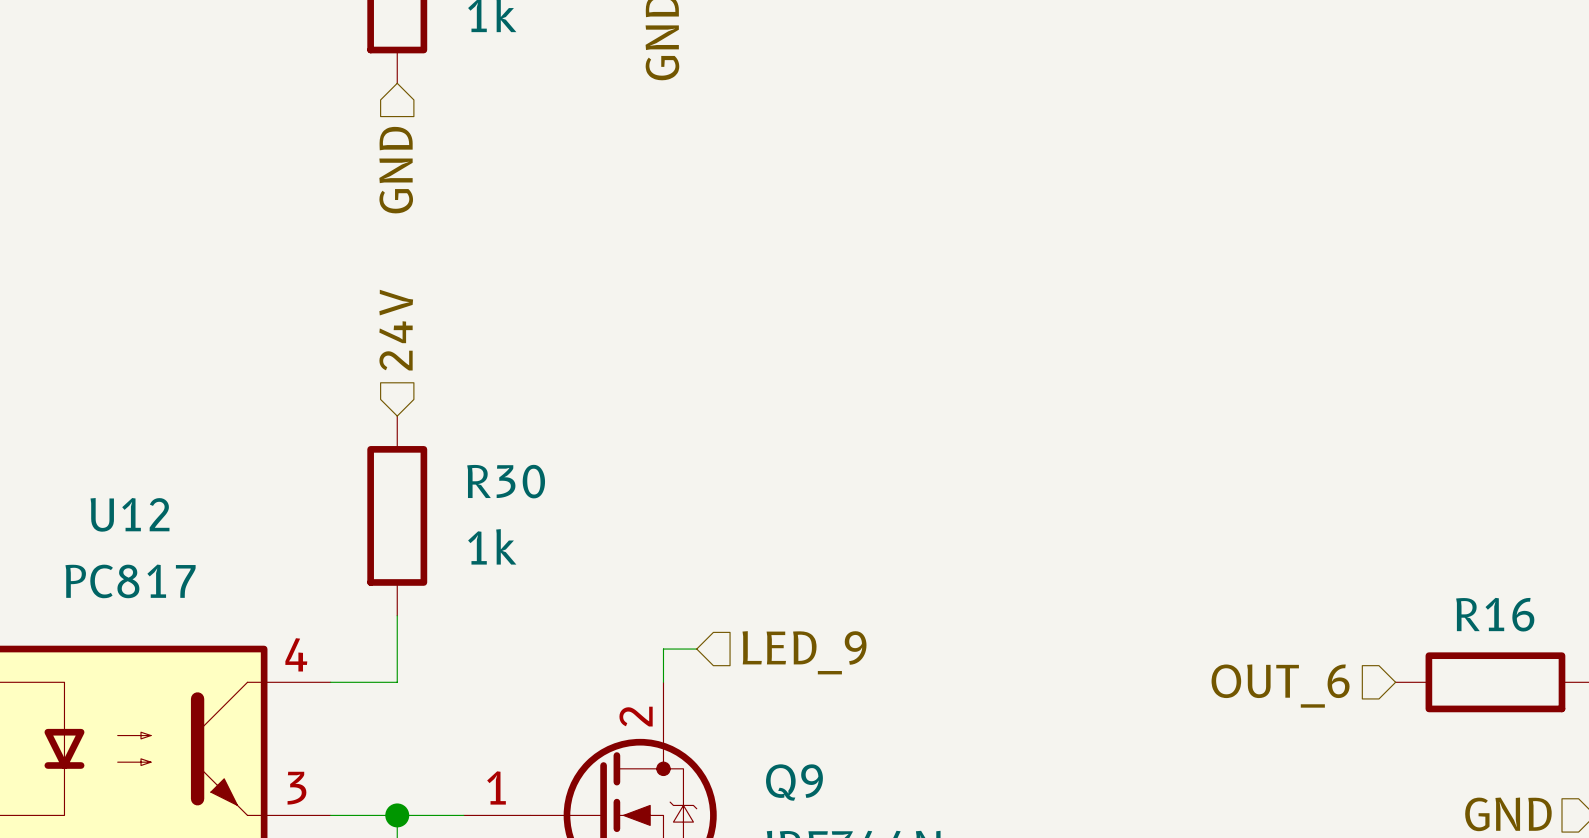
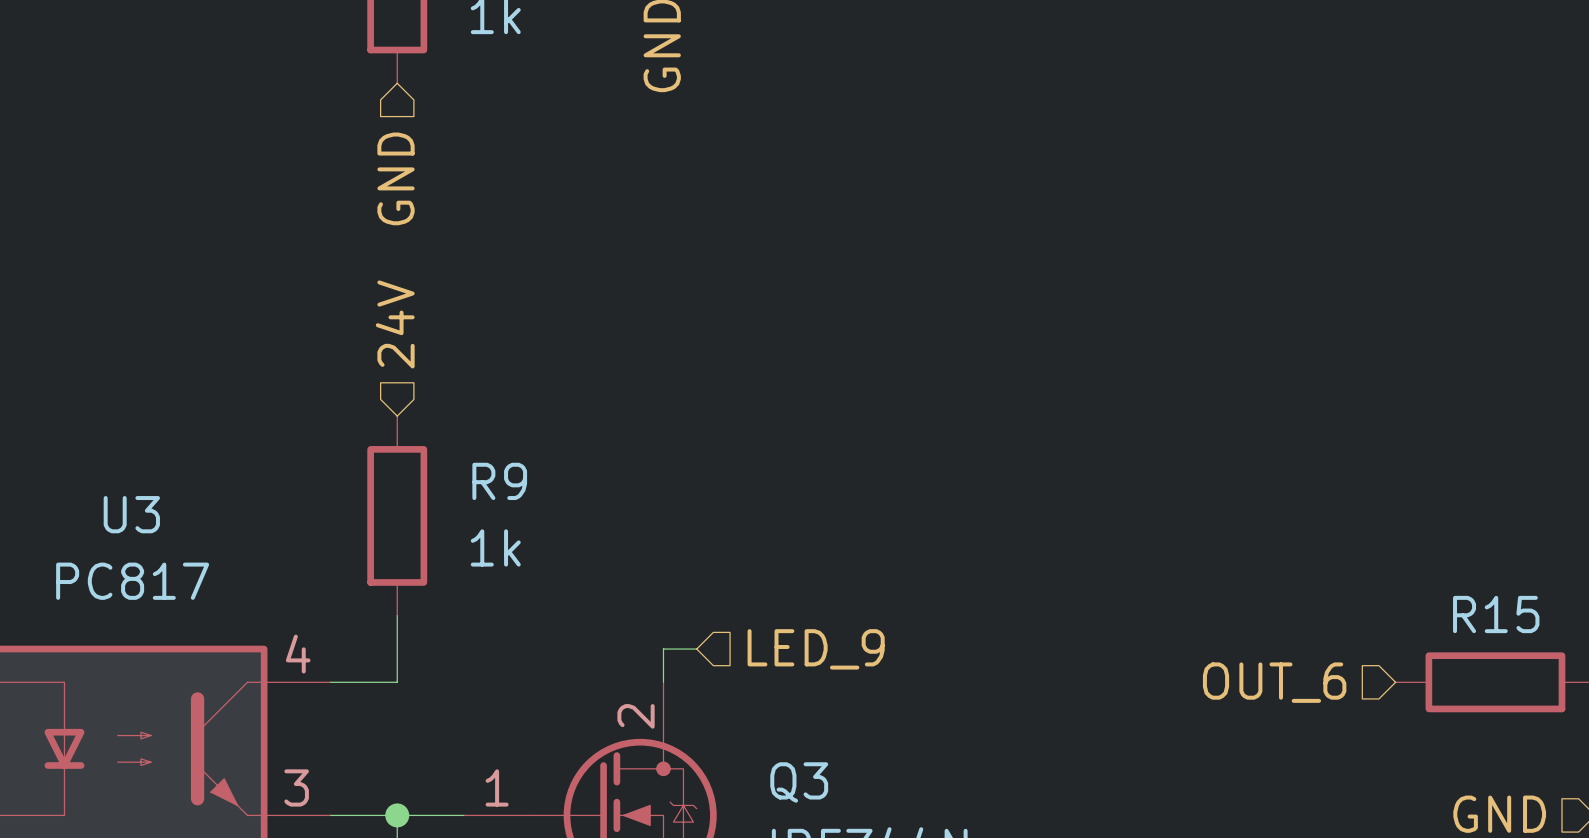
R30 name: R30 (506, 481) -> R9 (499, 481)
U12 name: U12 (130, 514) -> U3 (131, 514)
R16 name: R16 (1495, 614) -> R15 (1496, 614)
Q9 name: Q9 (794, 782) -> Q3 (799, 782)

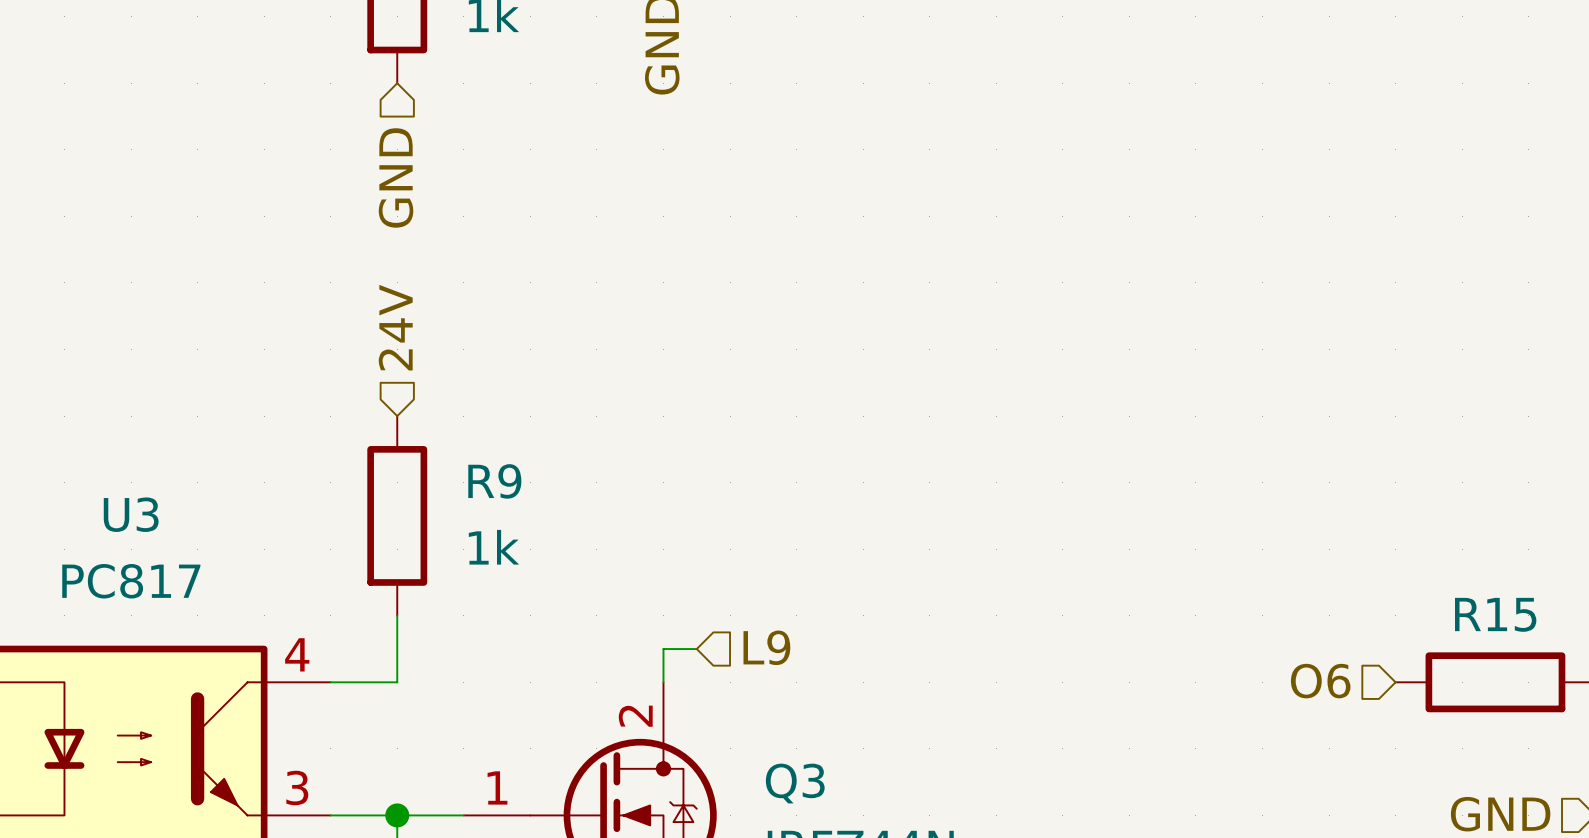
hierarchical label: LED_9 (816, 649) -> L9 (766, 647)
hierarchical label: OUT_6 (1274, 682) -> O6 (1320, 681)

